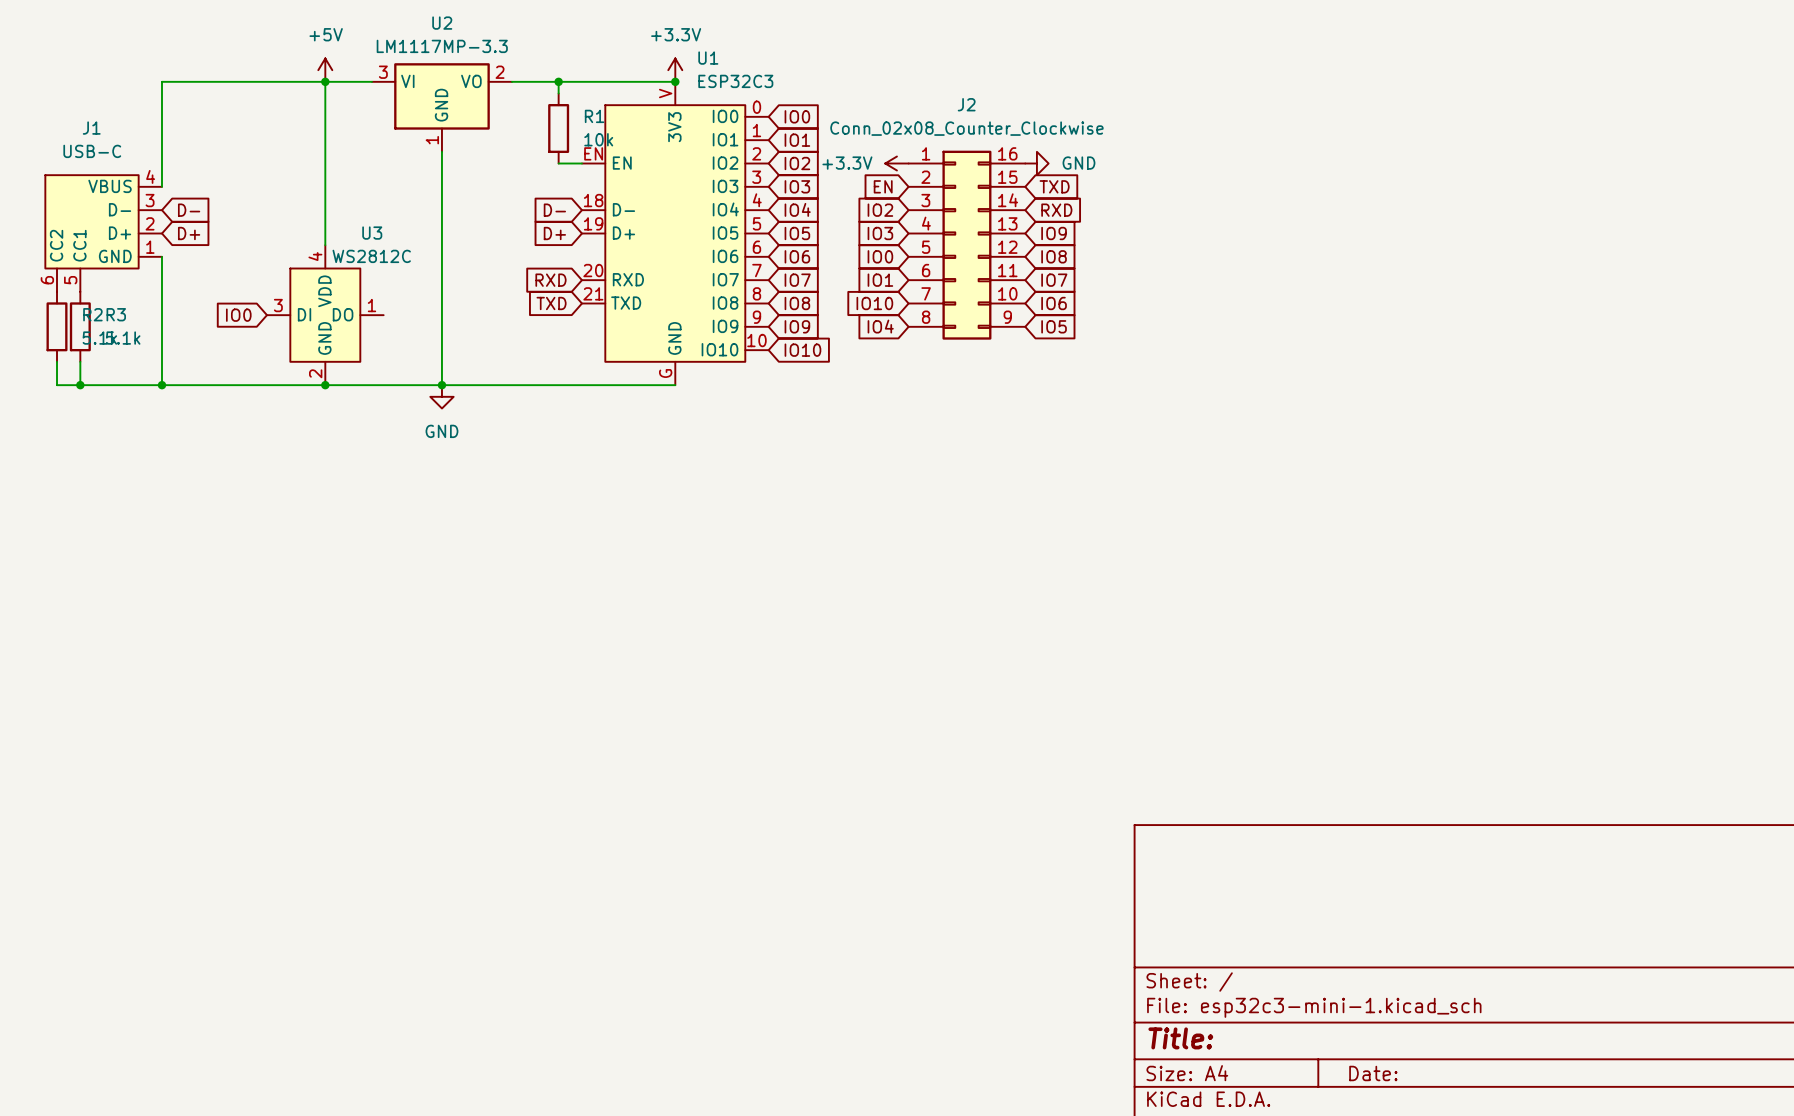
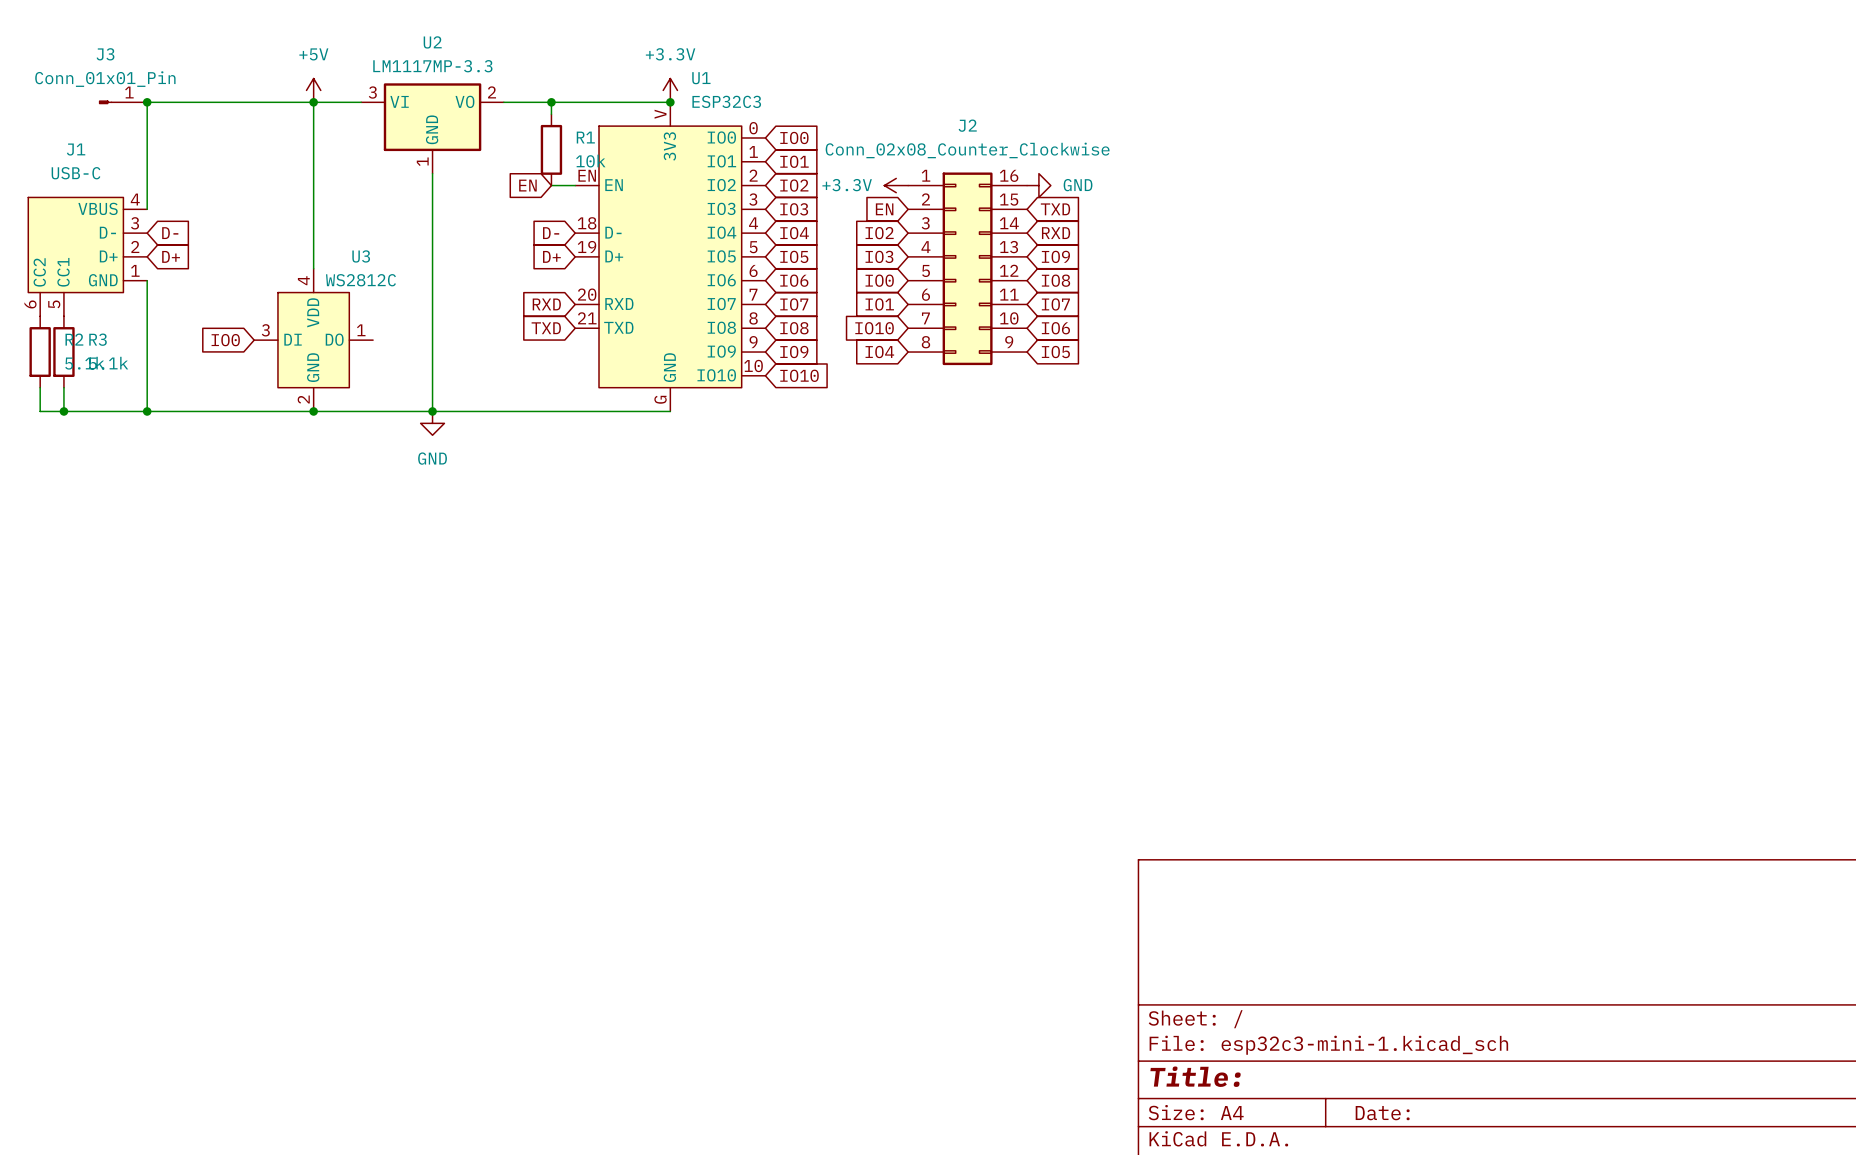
J3: none -> Conn_01x01_Pin (123, 102)
junction: none -> (147, 102)
global label: none -> EN (527, 185)

